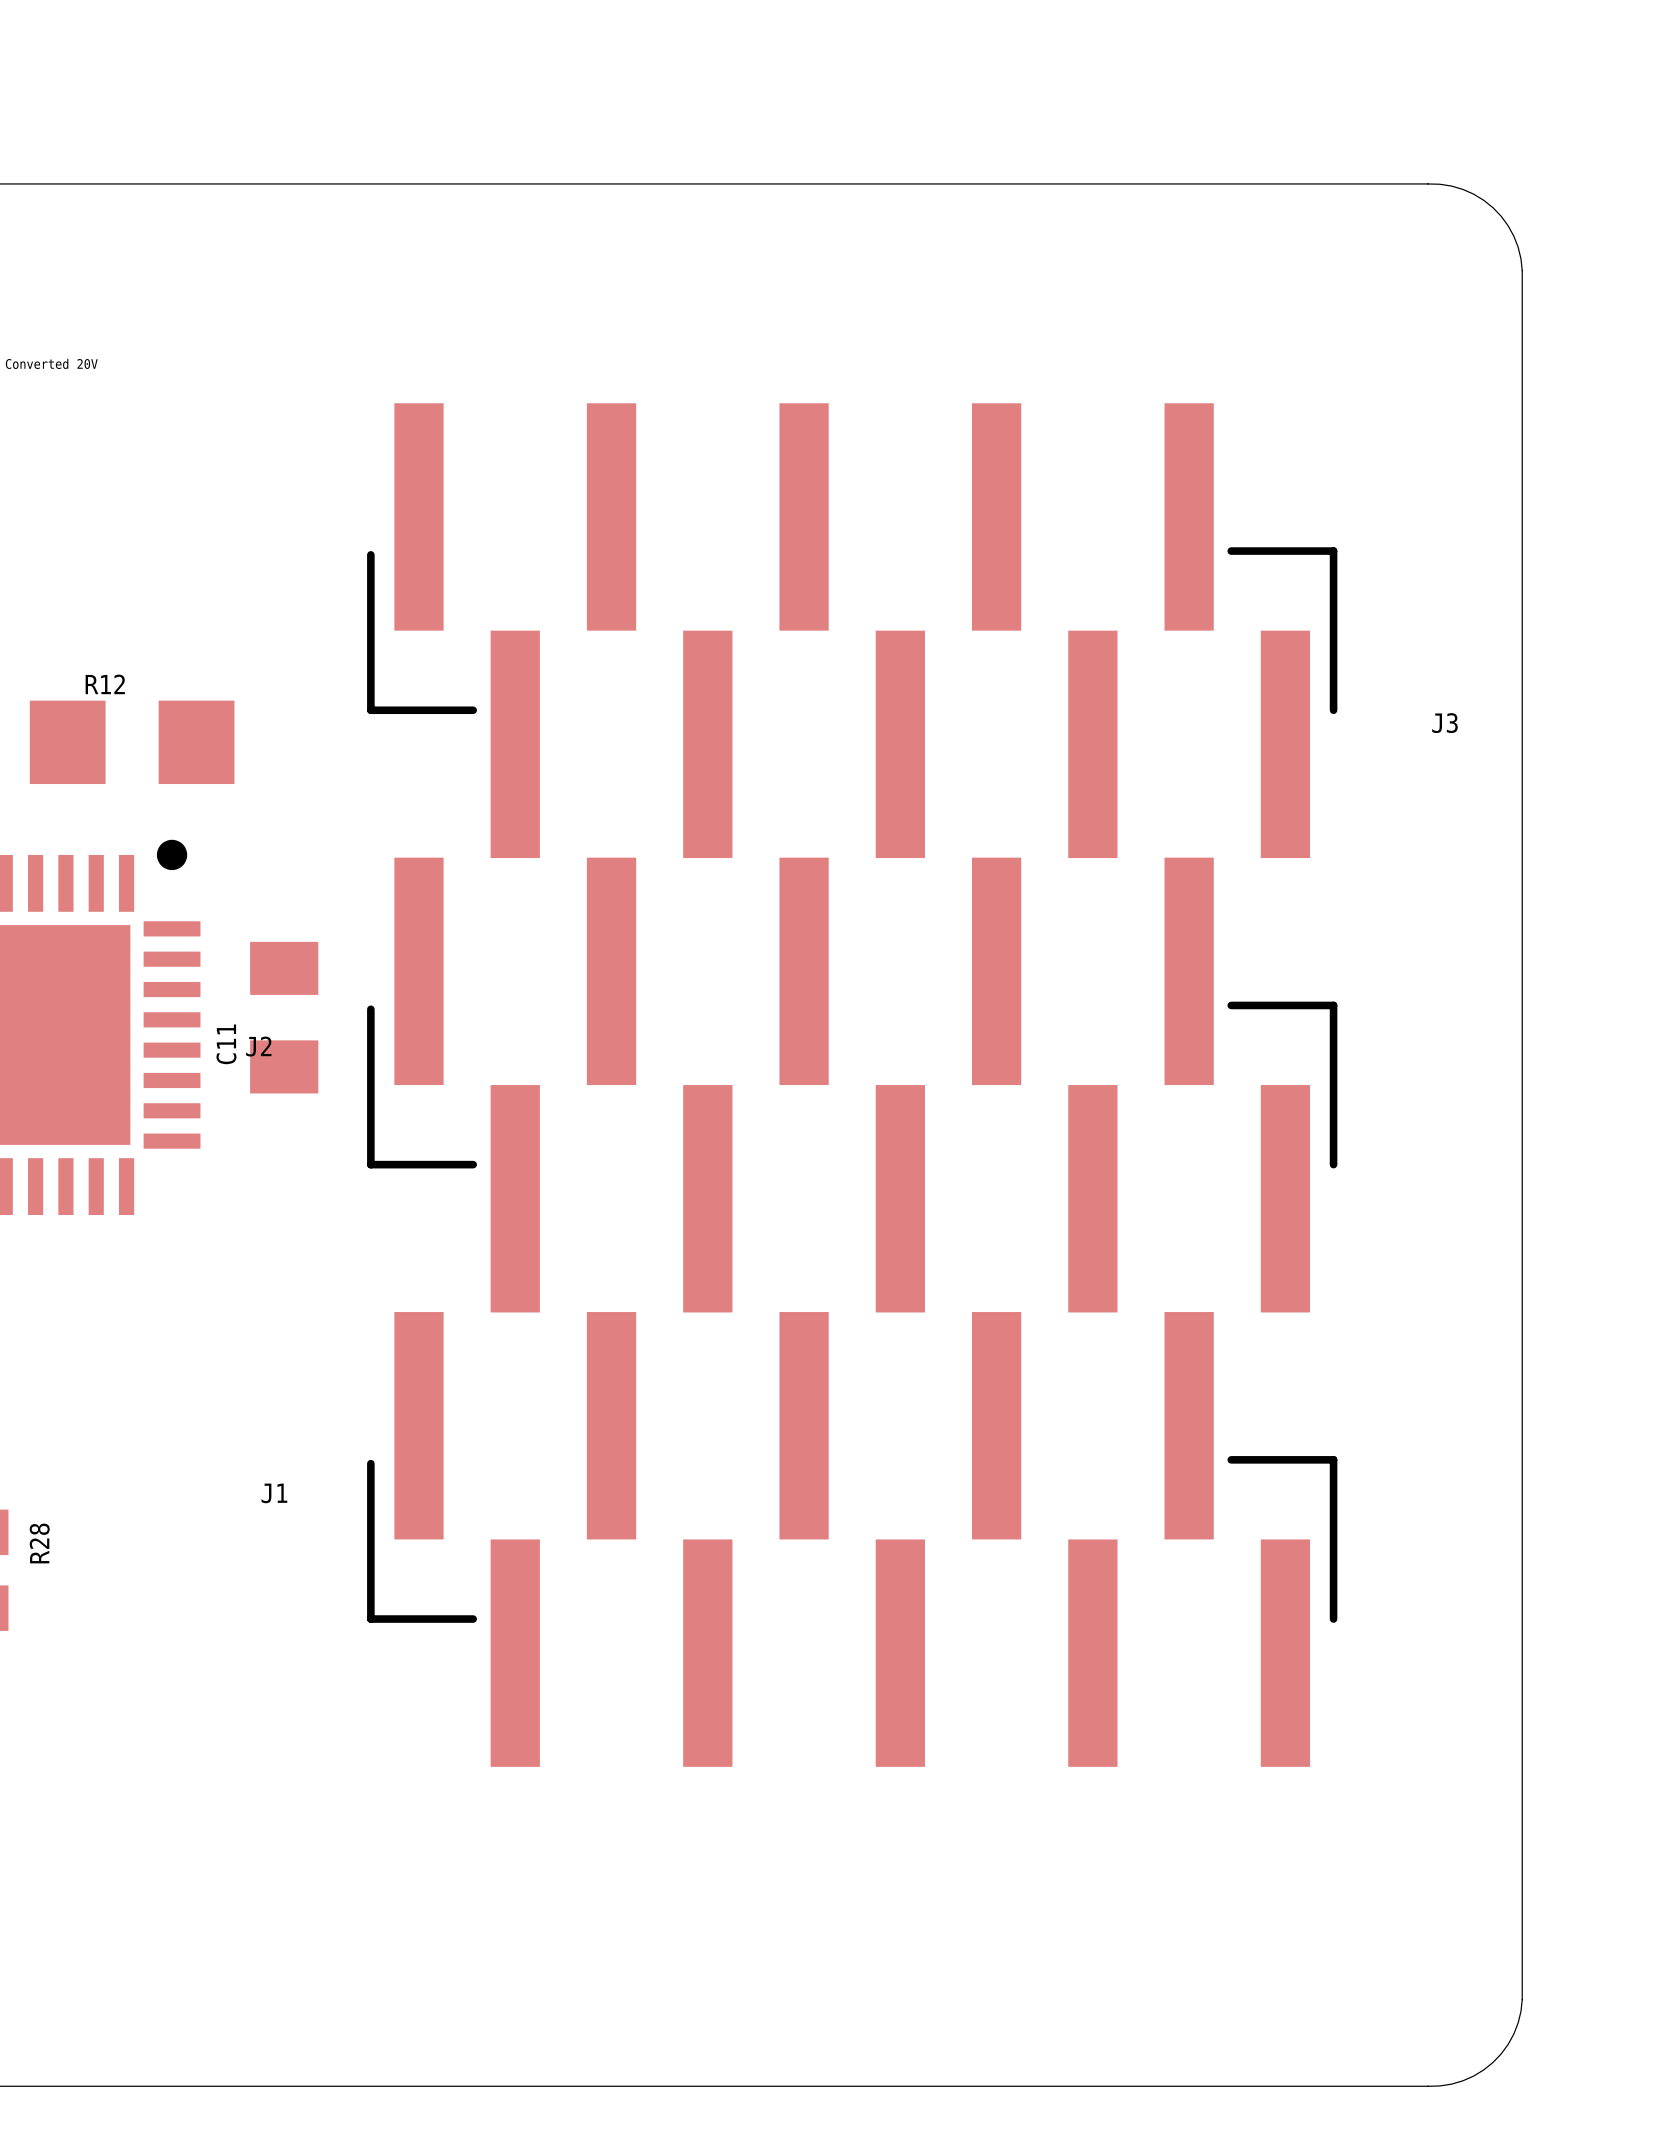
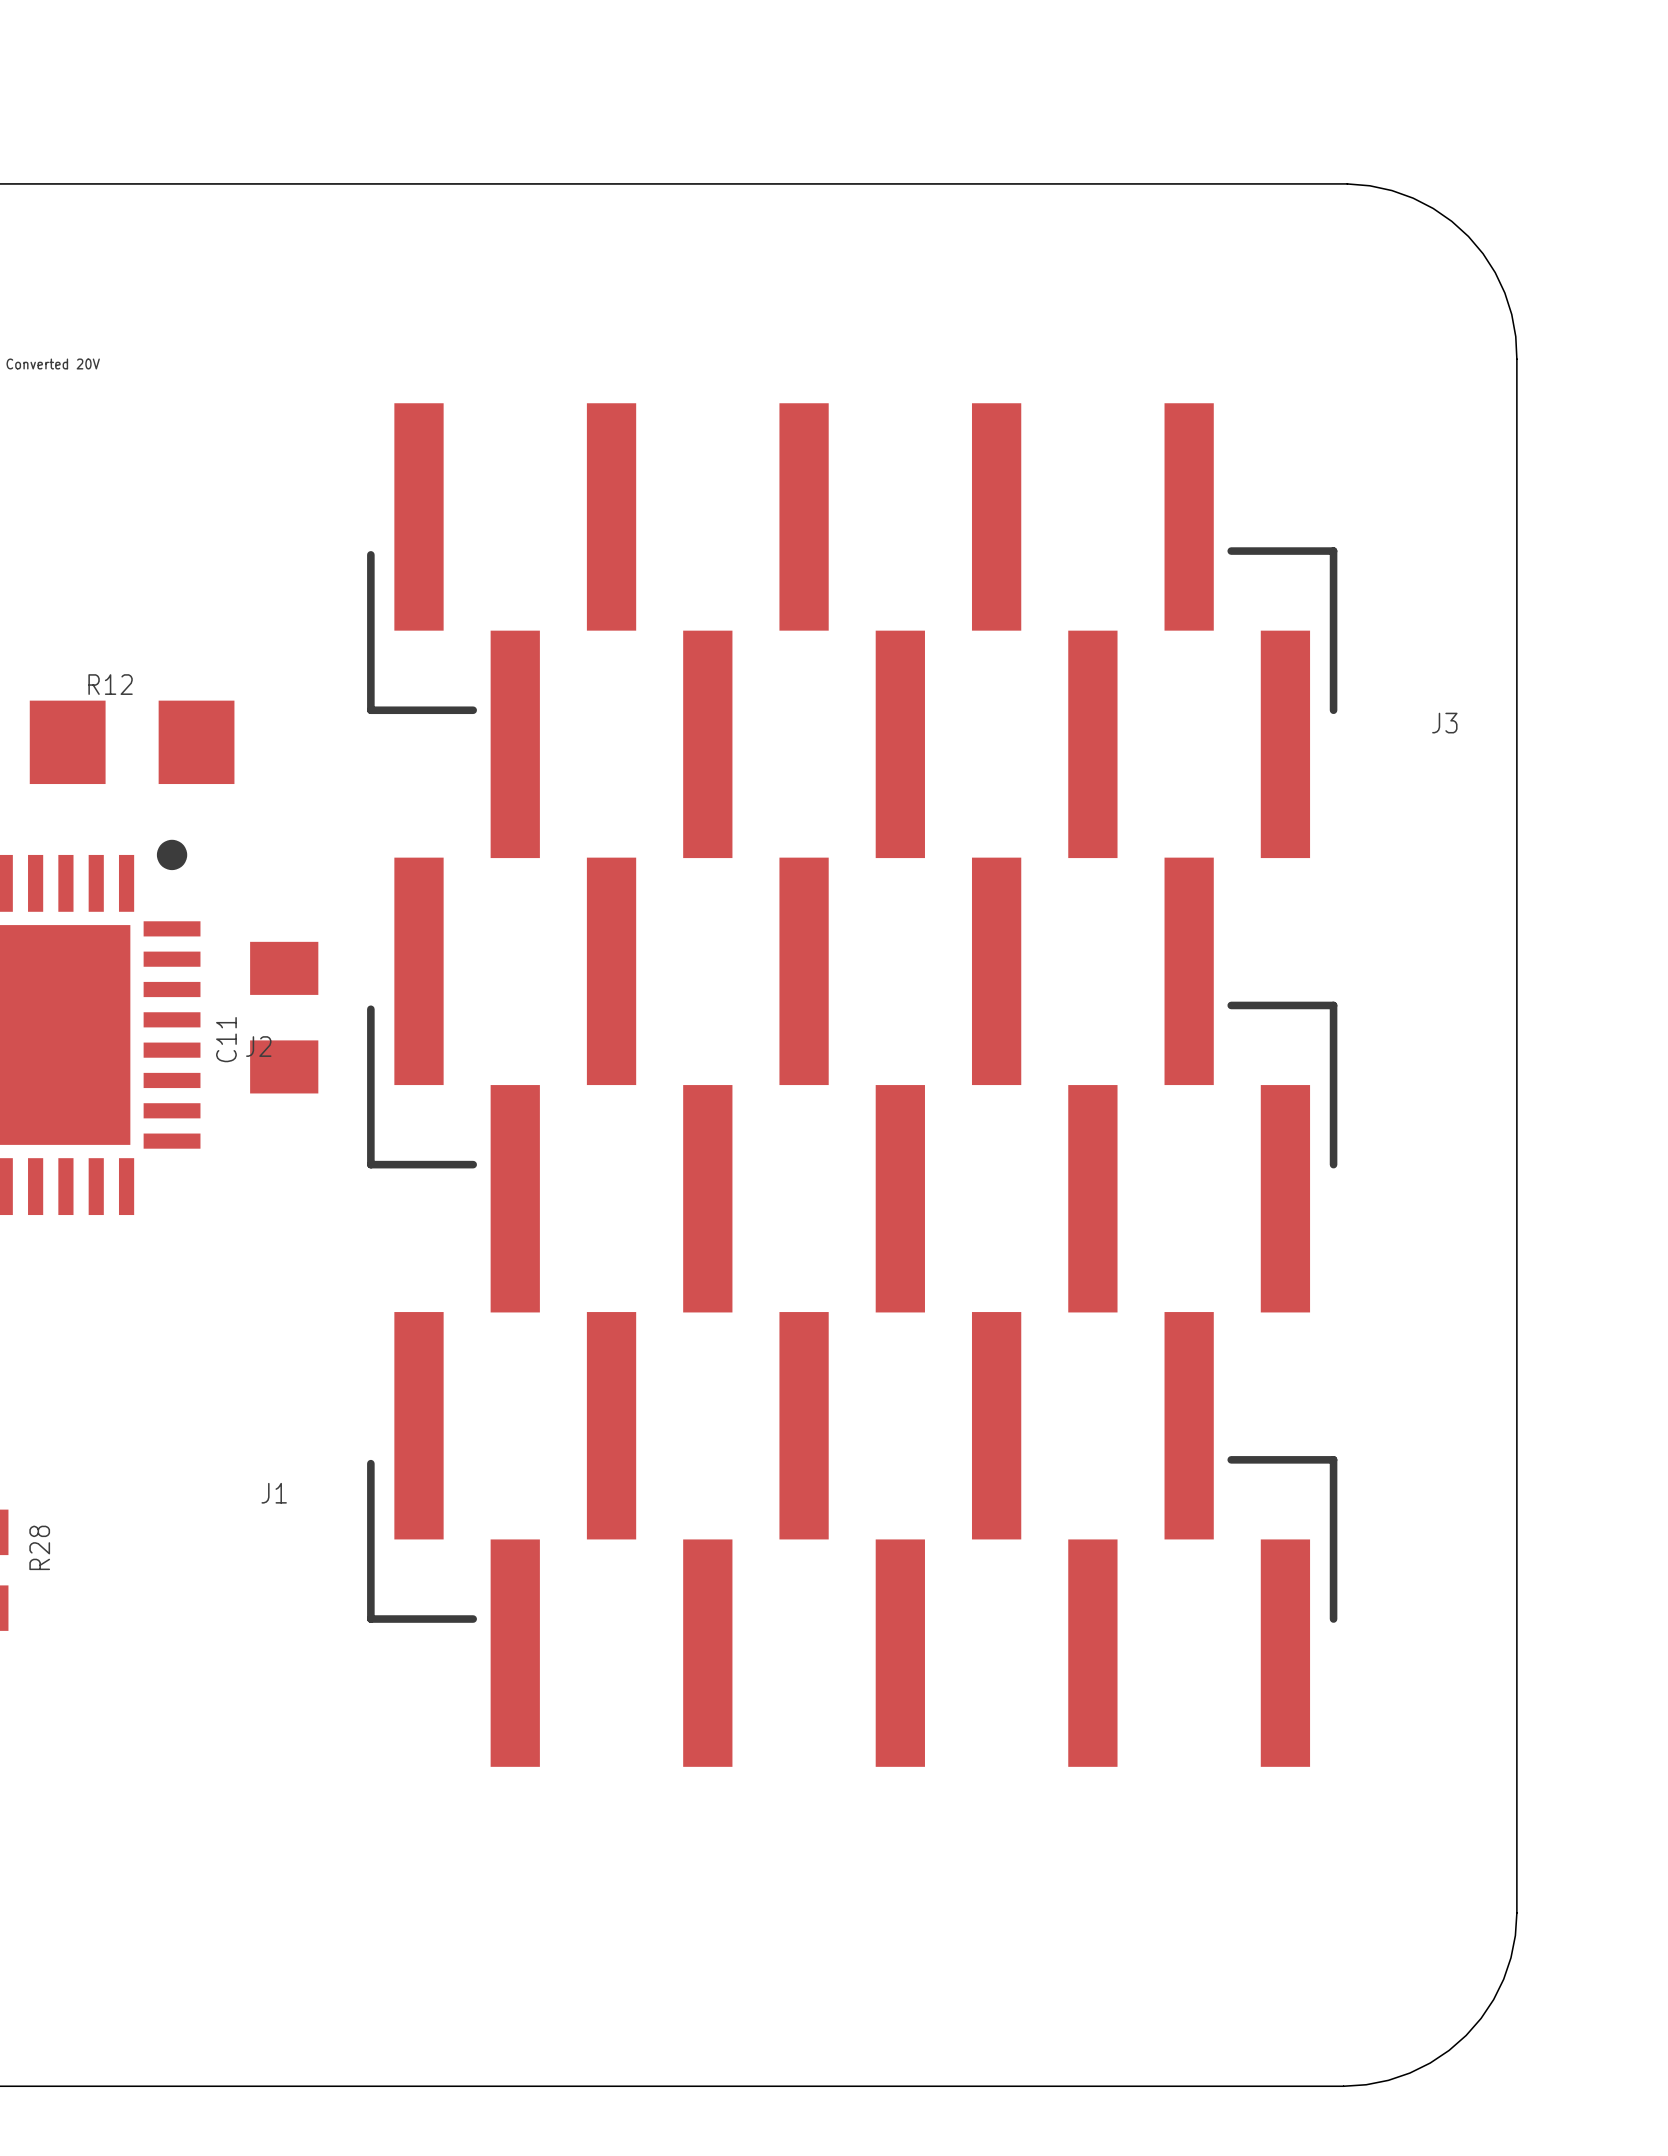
board edge: (1347, 183) (1439, 184) (1451, 186) (1473, 194) (1493, 207) (1508, 225) (1518, 247) (1522, 270) (1522, 1999) (1518, 2022) (1508, 2044) (1493, 2062) (1473, 2076) (1451, 2084) (1439, 2085) (1343, 2086) -> (1347, 183) (1369, 185) (1413, 198) (1433, 208) (1468, 236) (1495, 272) (1511, 314) (1515, 336) (1516, 1912) (1510, 1957) (1503, 1979) (1481, 2018) (1466, 2035) (1449, 2050) (1409, 2073) (1388, 2080) (1343, 2086)

